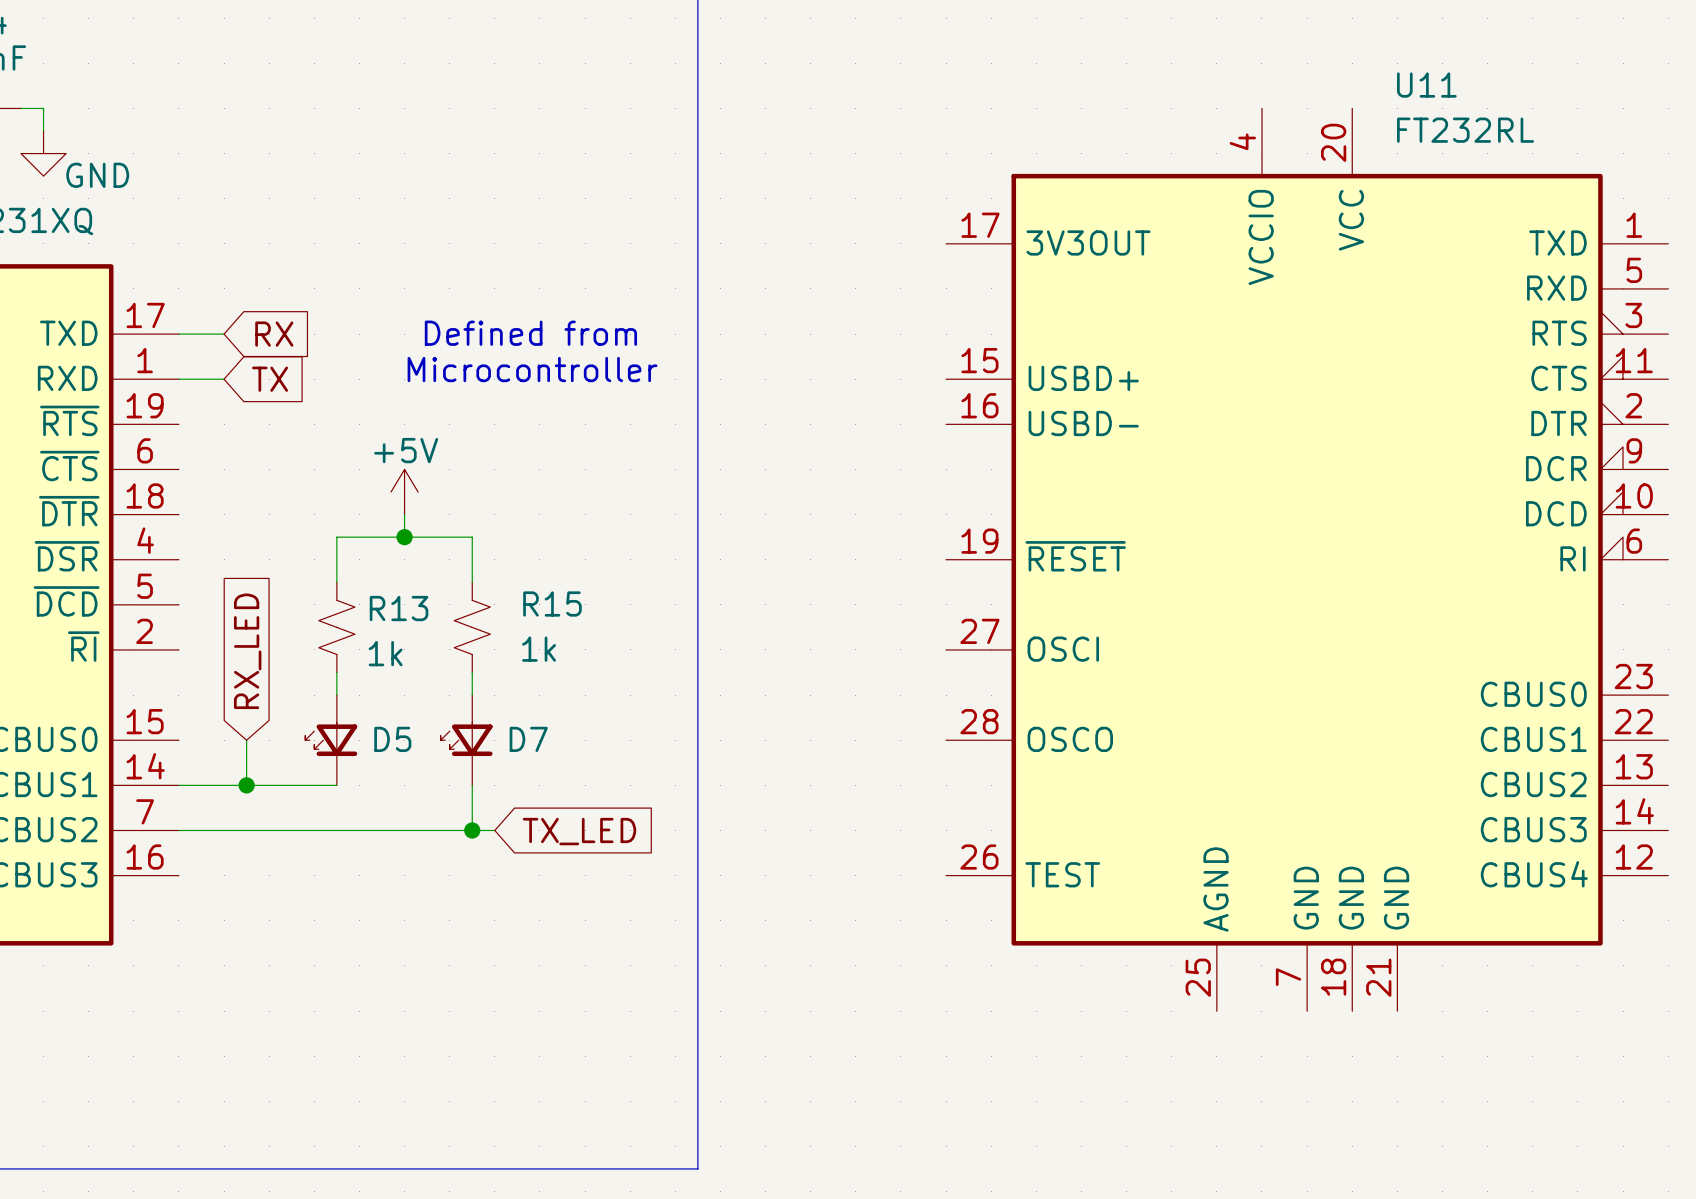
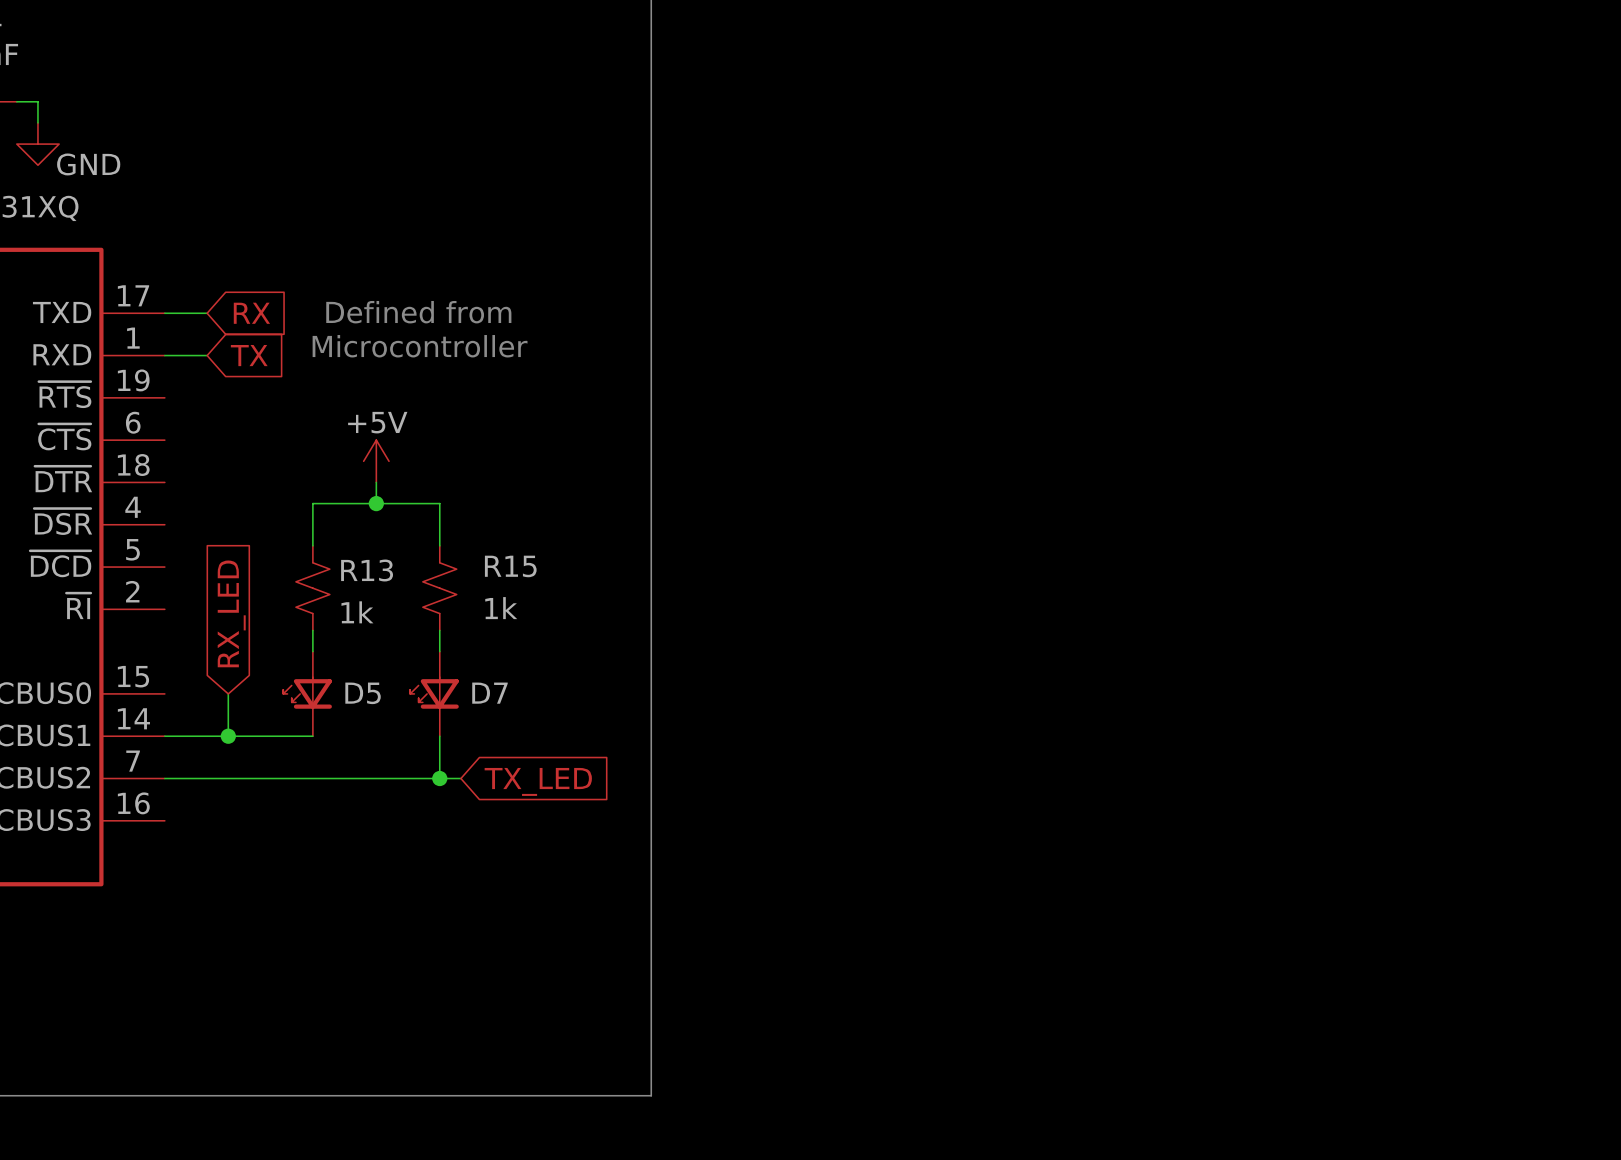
text position: Defined from (530, 333) -> Defined from (418, 312)
text position: Microcontroller (532, 369) -> Microcontroller (420, 346)
U11: FT232RL (1307, 559) -> none

